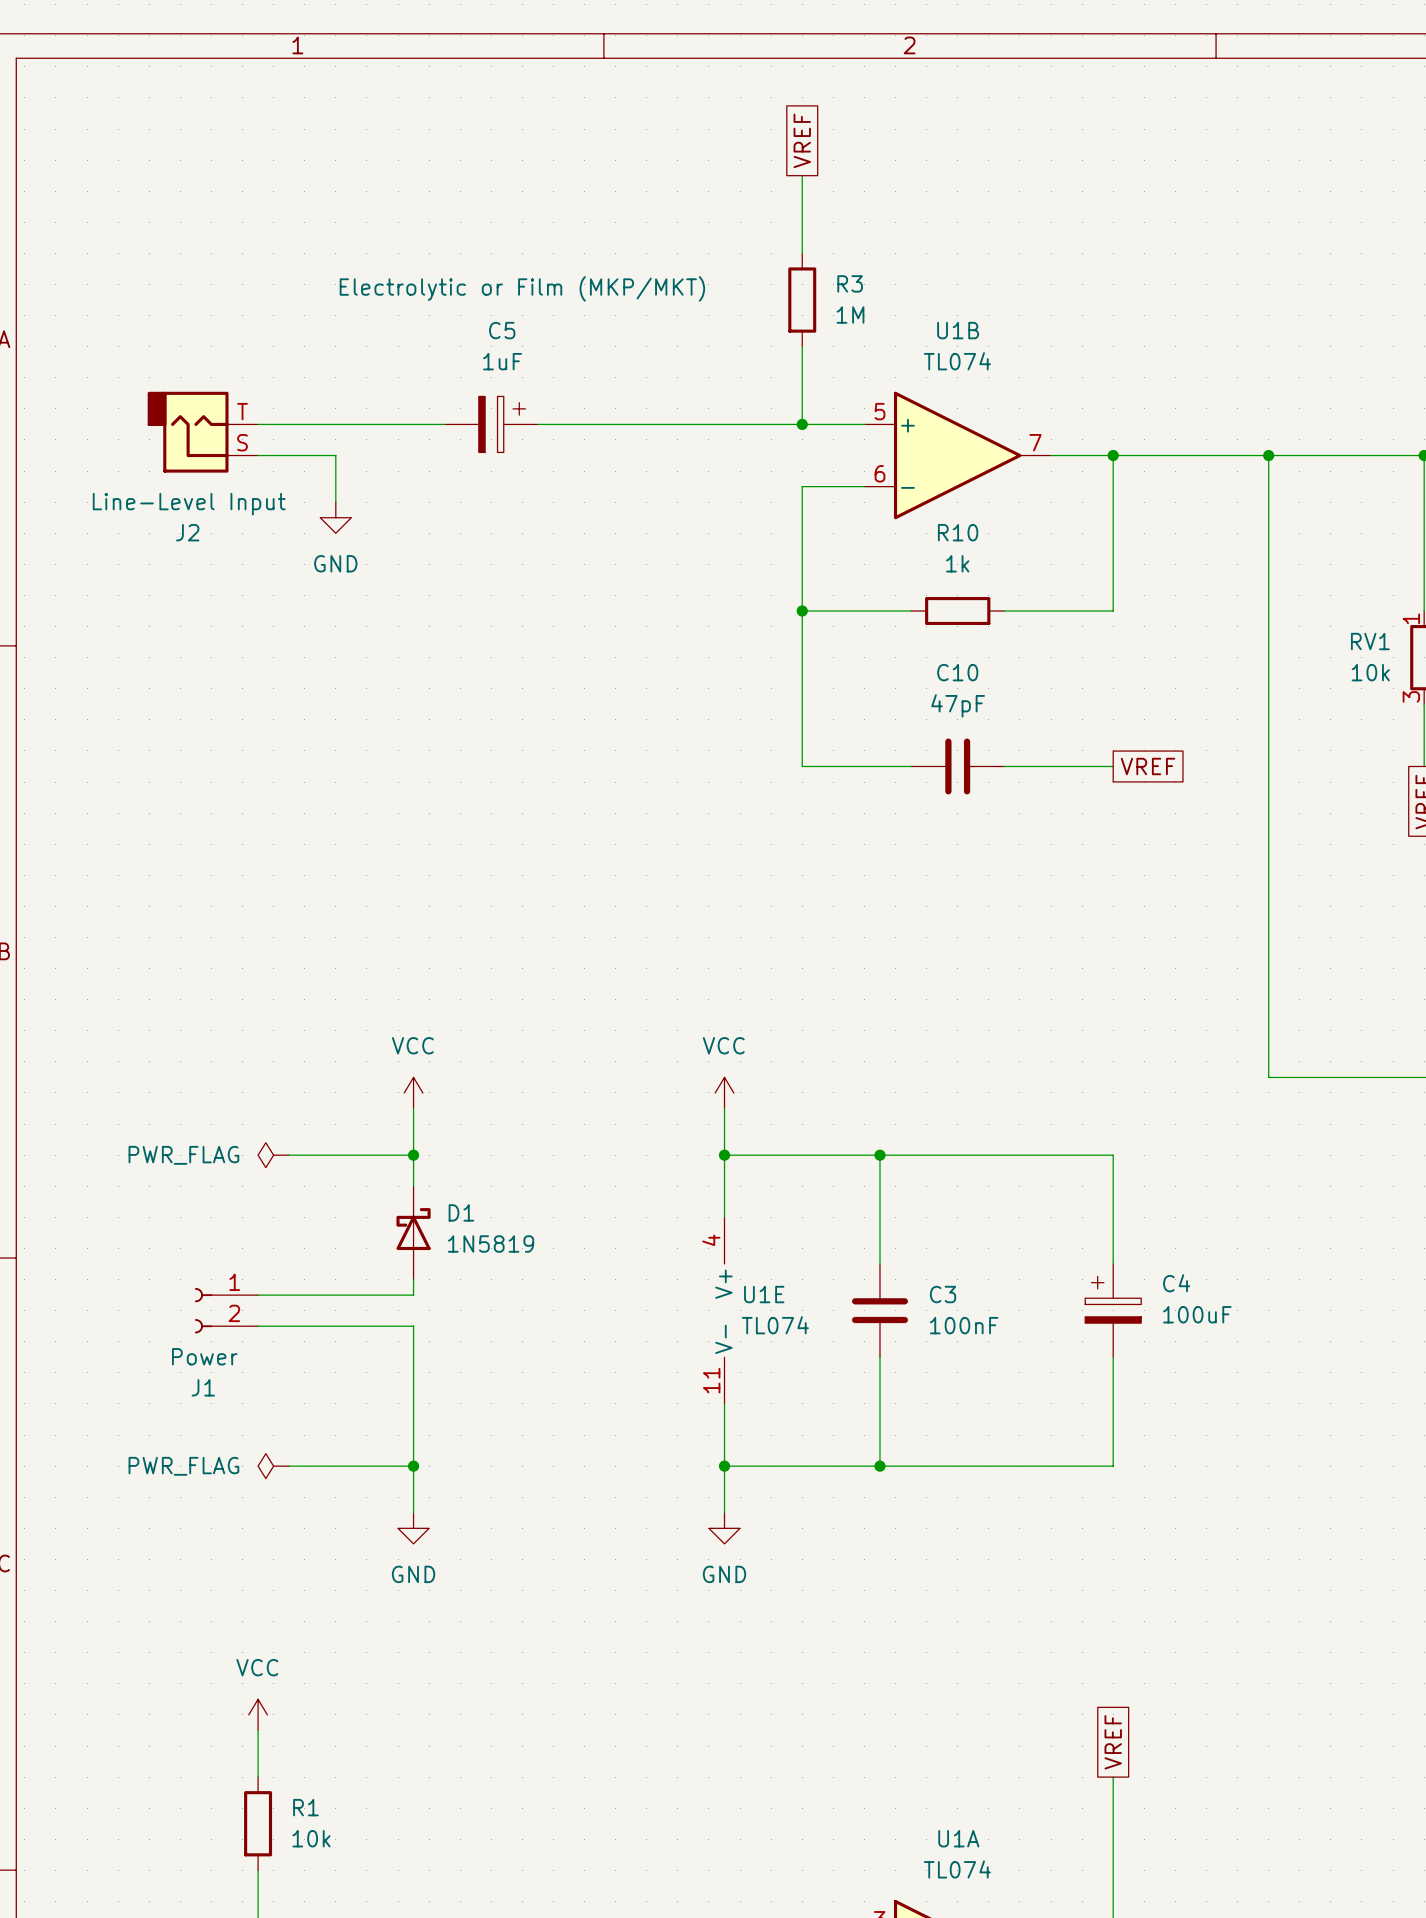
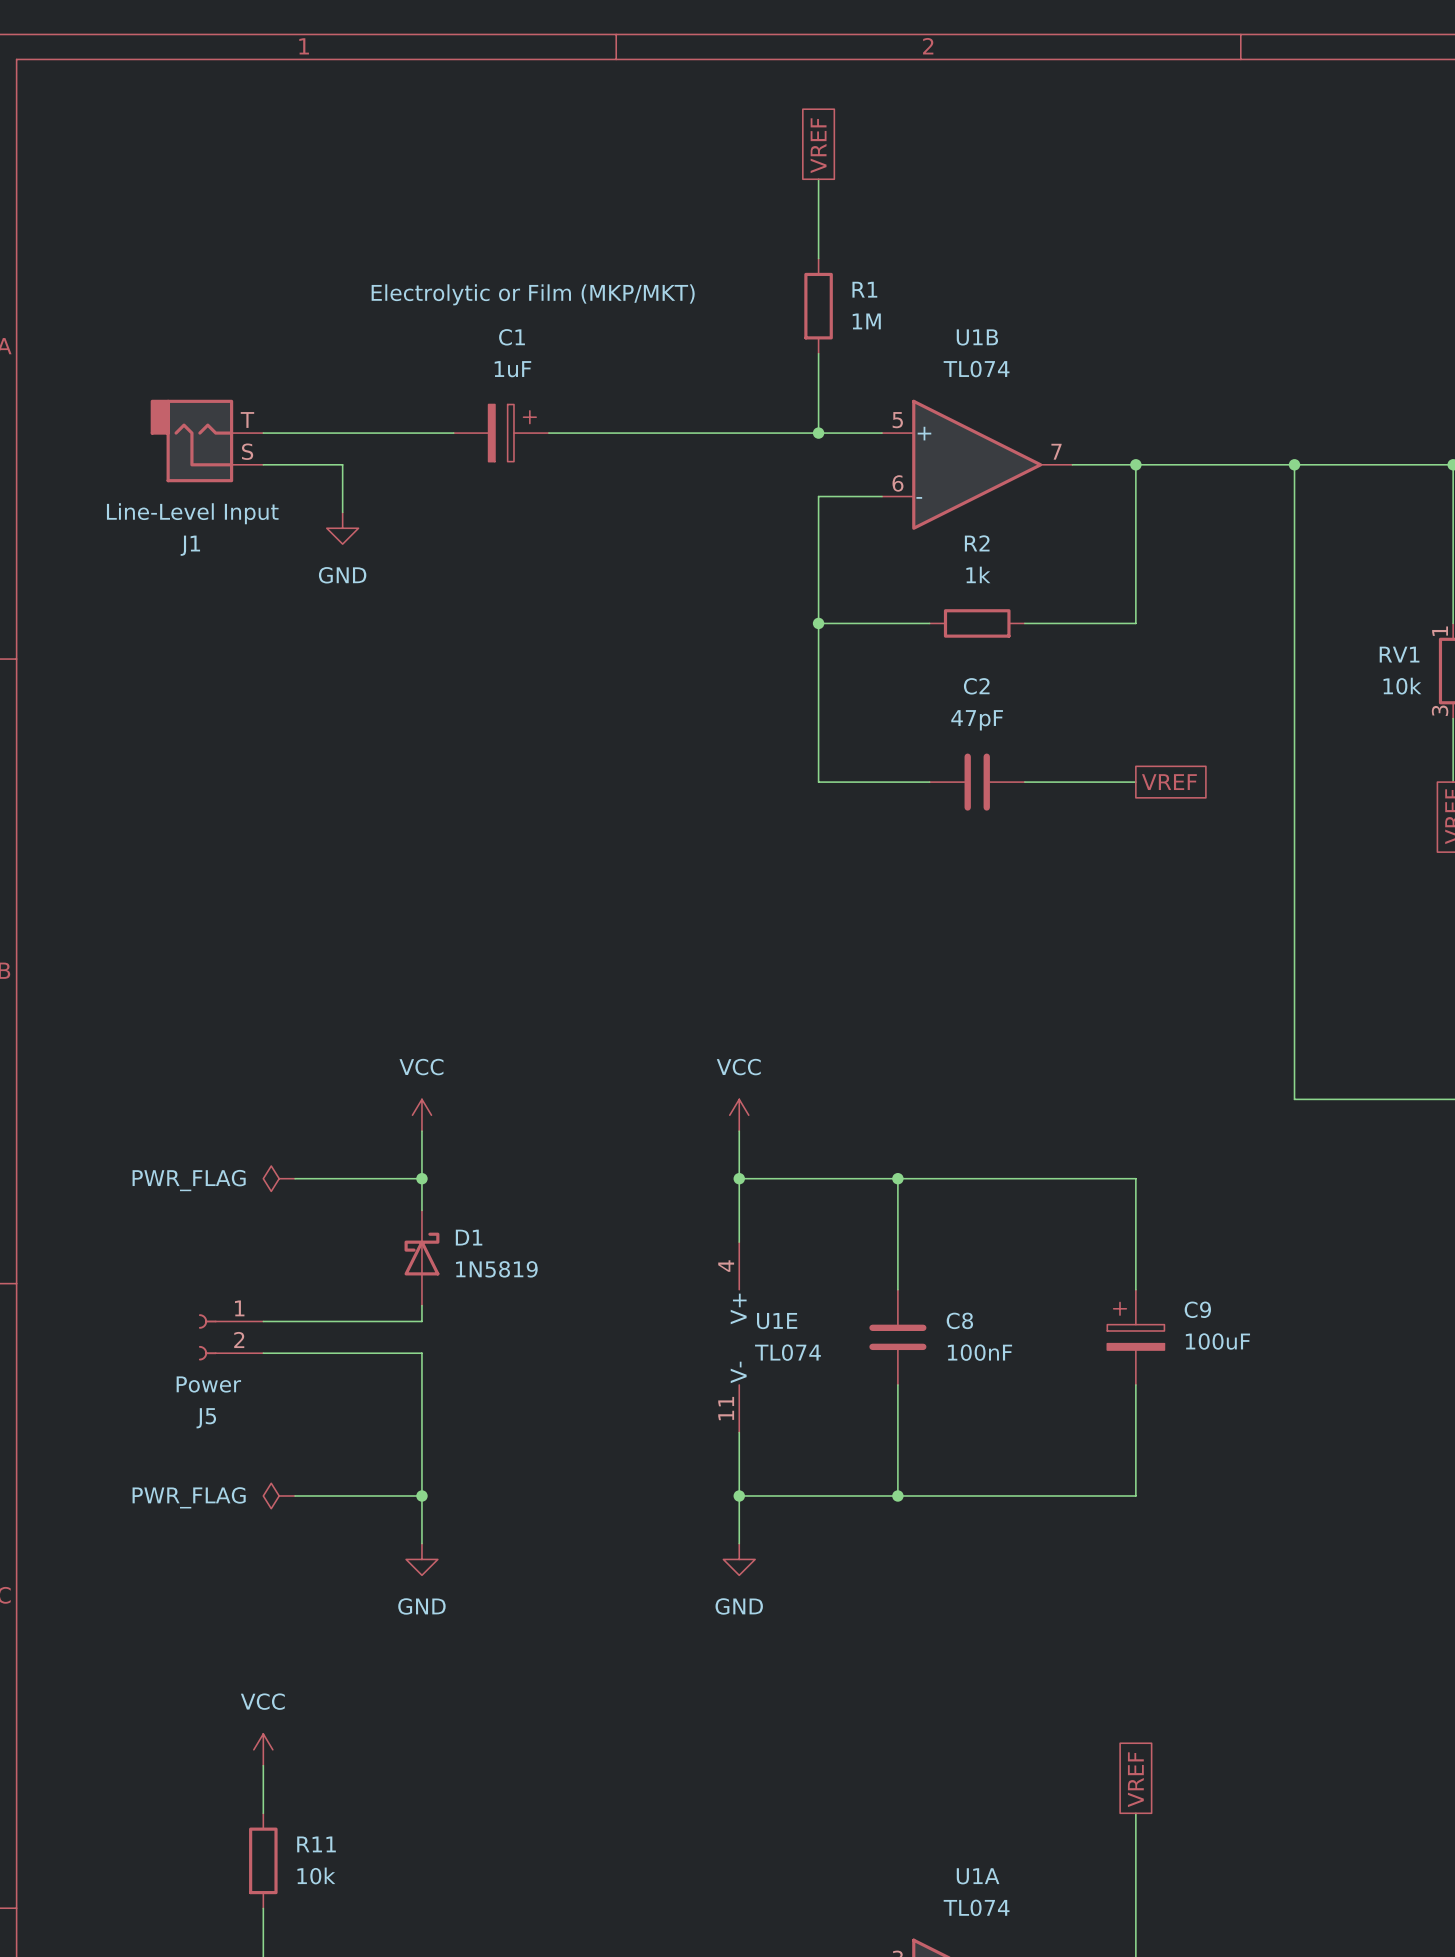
R3 name: R3 (850, 283) -> R1 (864, 289)
C5 name: C5 (502, 330) -> C1 (512, 337)
J2 name: J2 (187, 532) -> J1 (190, 545)
R10 name: R10 (958, 532) -> R2 (977, 543)
C10 name: C10 (957, 672) -> C2 (976, 686)
C4 name: C4 (1176, 1283) -> C9 (1197, 1309)
C3 name: C3 (943, 1294) -> C8 (959, 1320)
J1 name: J1 (203, 1387) -> J5 (206, 1418)
R1 name: R1 (305, 1807) -> R11 (316, 1844)

